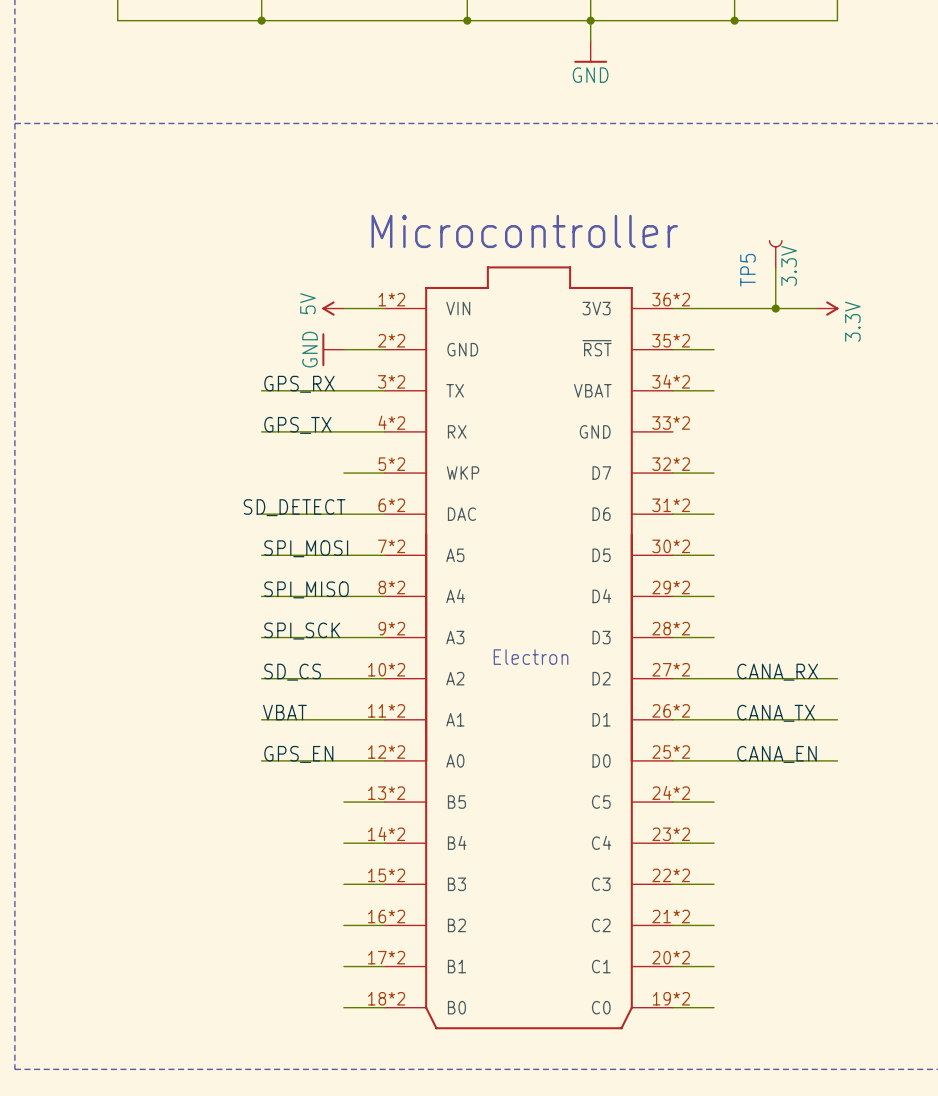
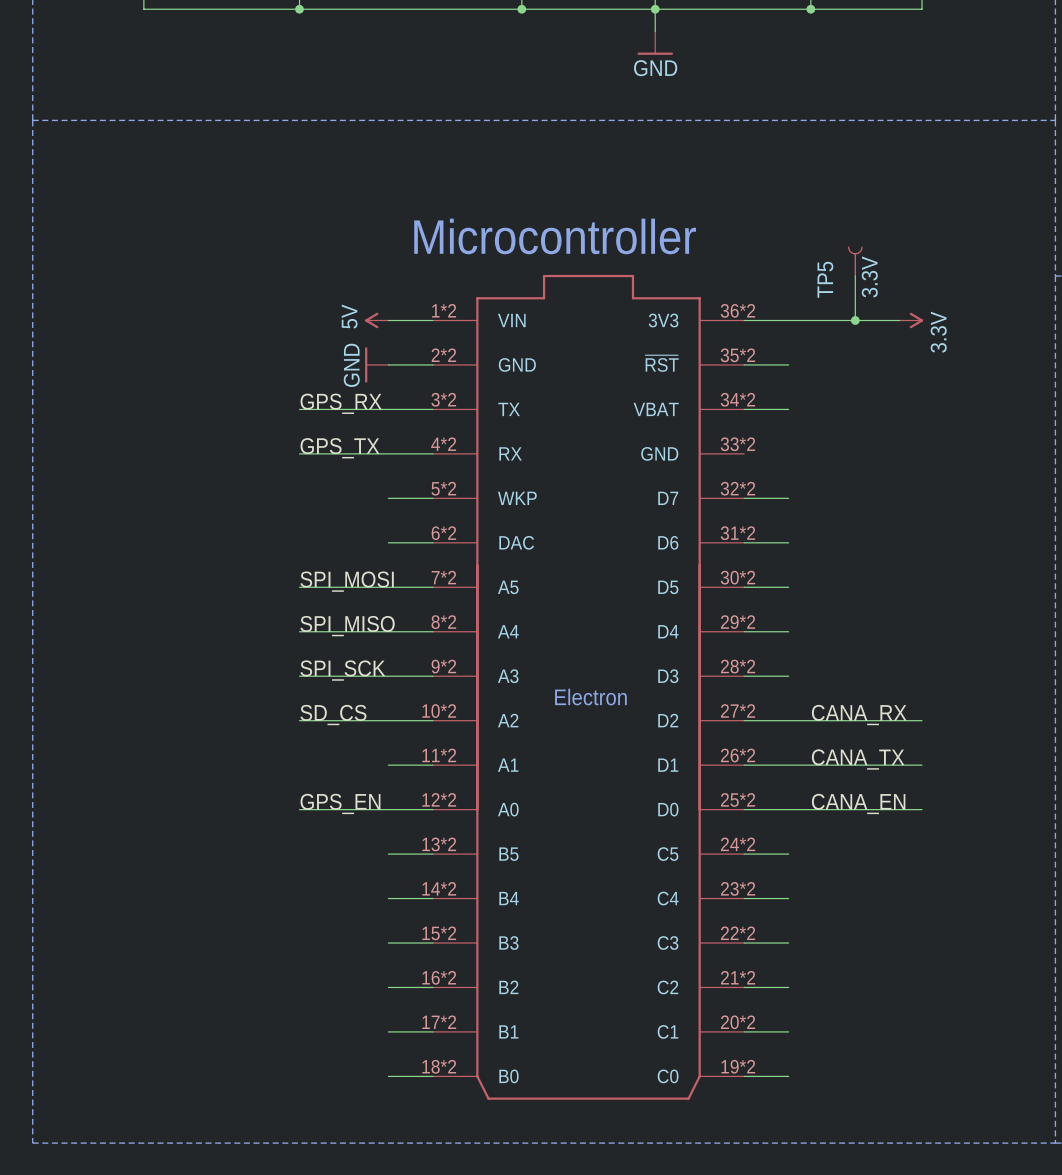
label: SD_DETECT (294, 507) -> none
wire: (261, 514) (343, 514) -> none
label: VBAT (284, 712) -> none
wire: (261, 719) (343, 719) -> none

